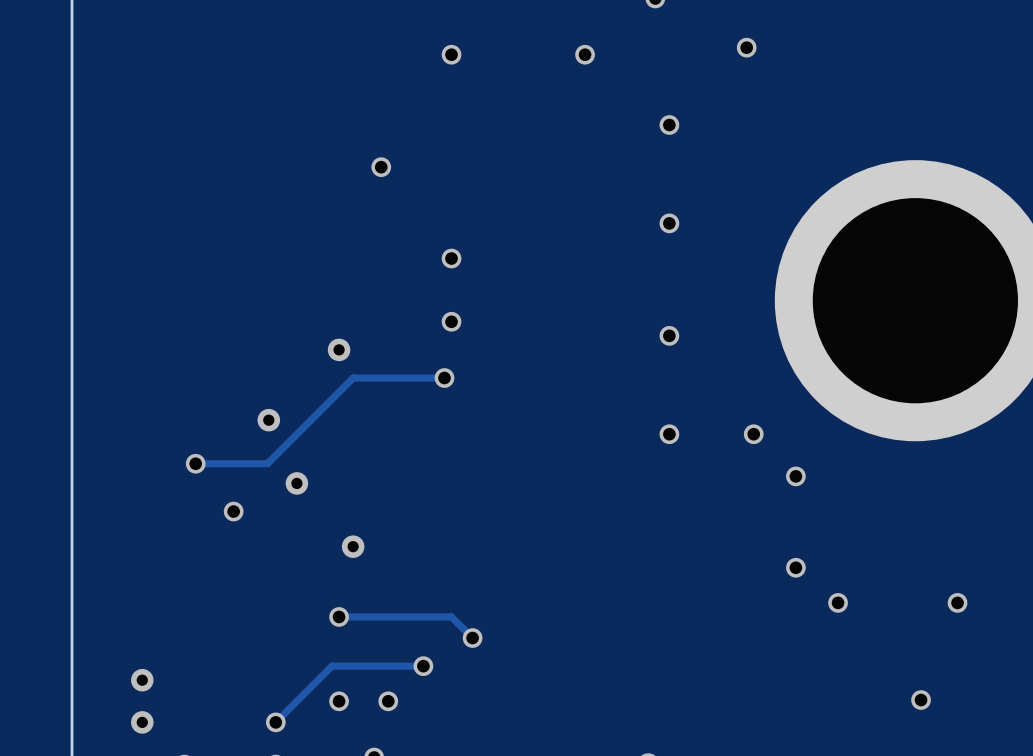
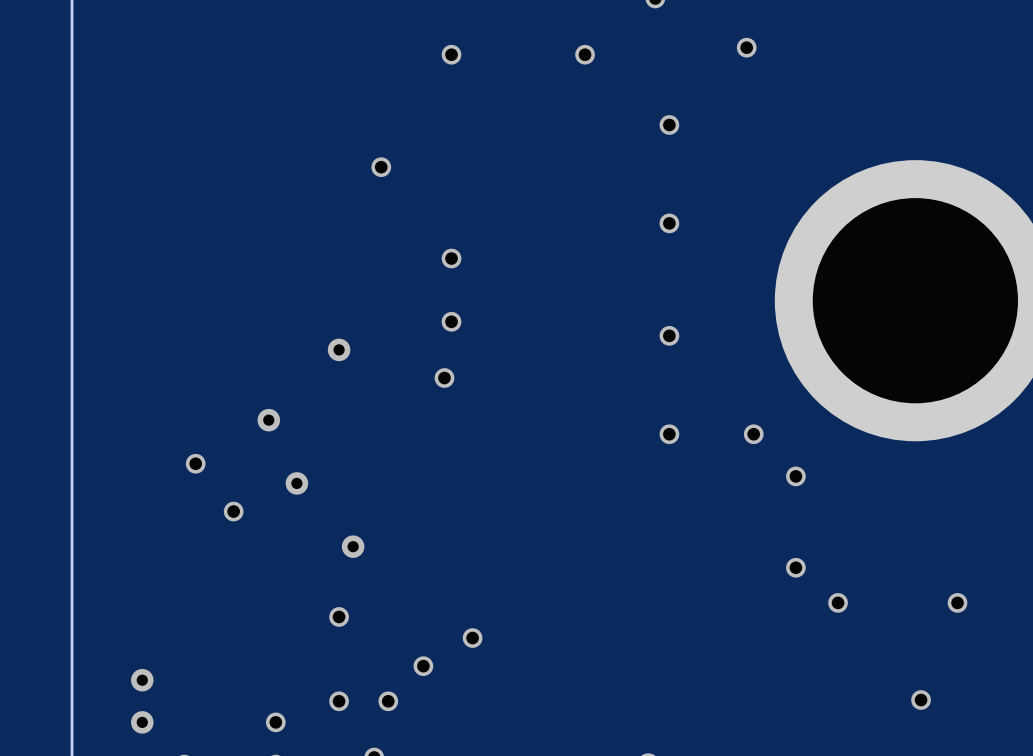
track: (444, 378) (353, 378) (267, 463) (195, 463) -> none
track: (339, 616) (451, 616) (472, 638) -> none
track: (423, 666) (332, 666) (275, 722) -> none

